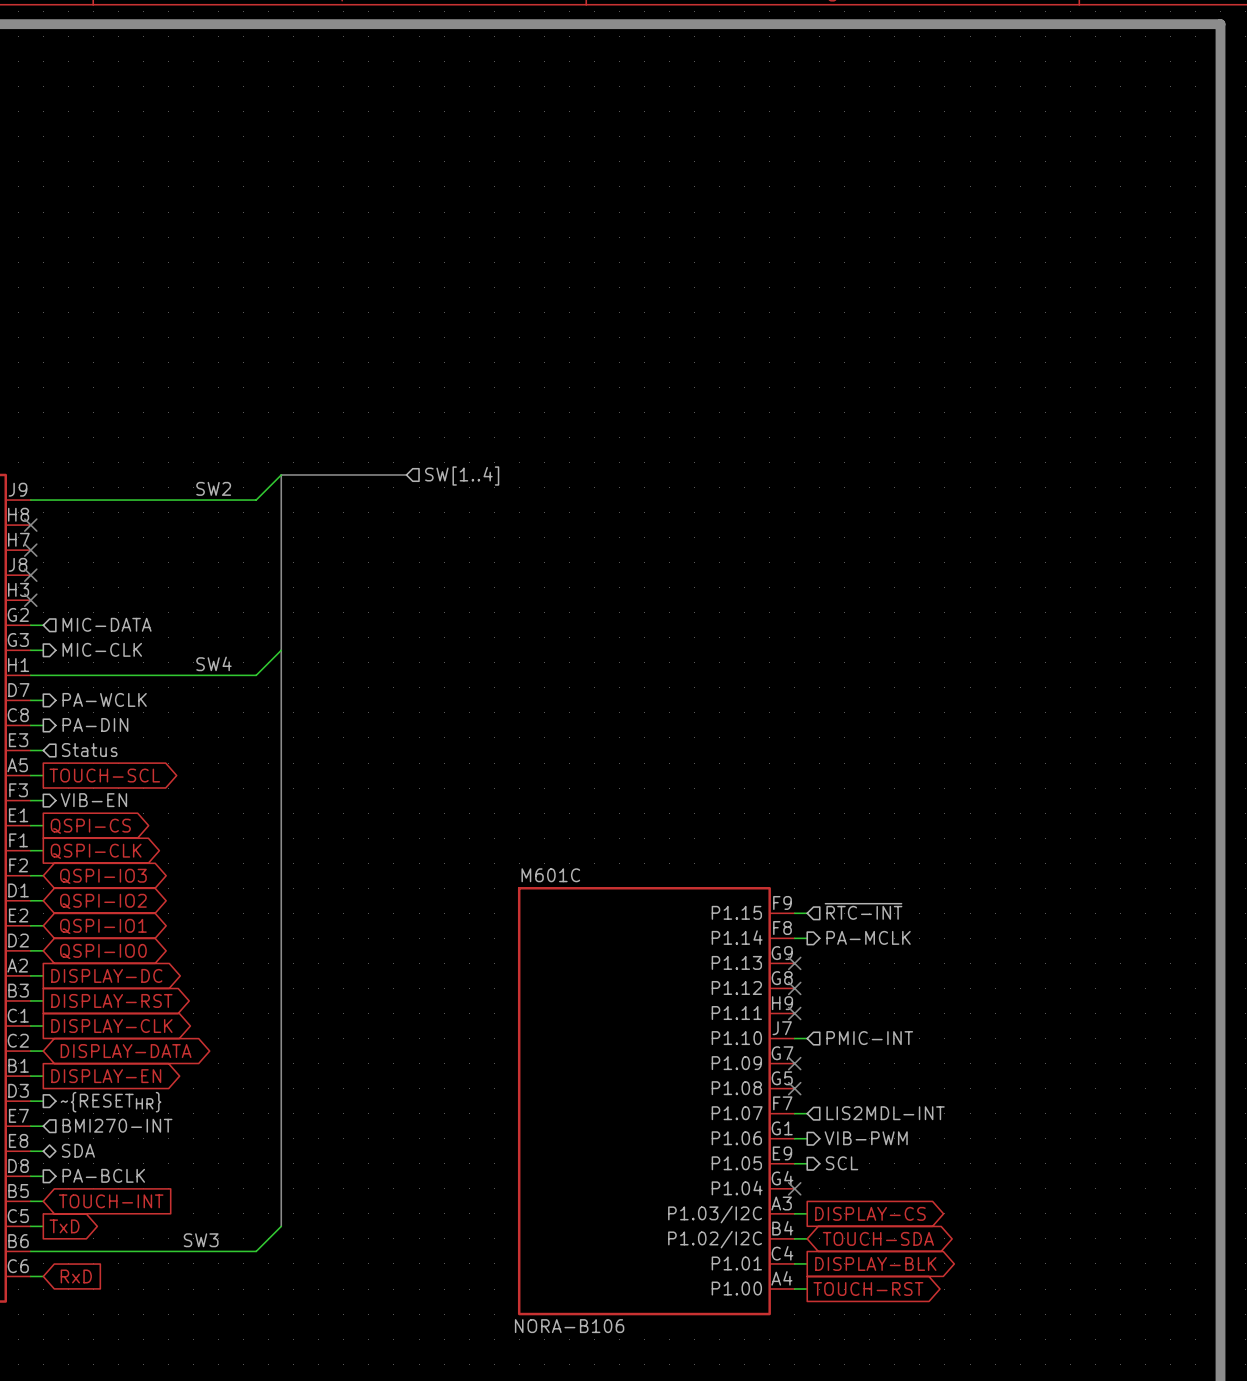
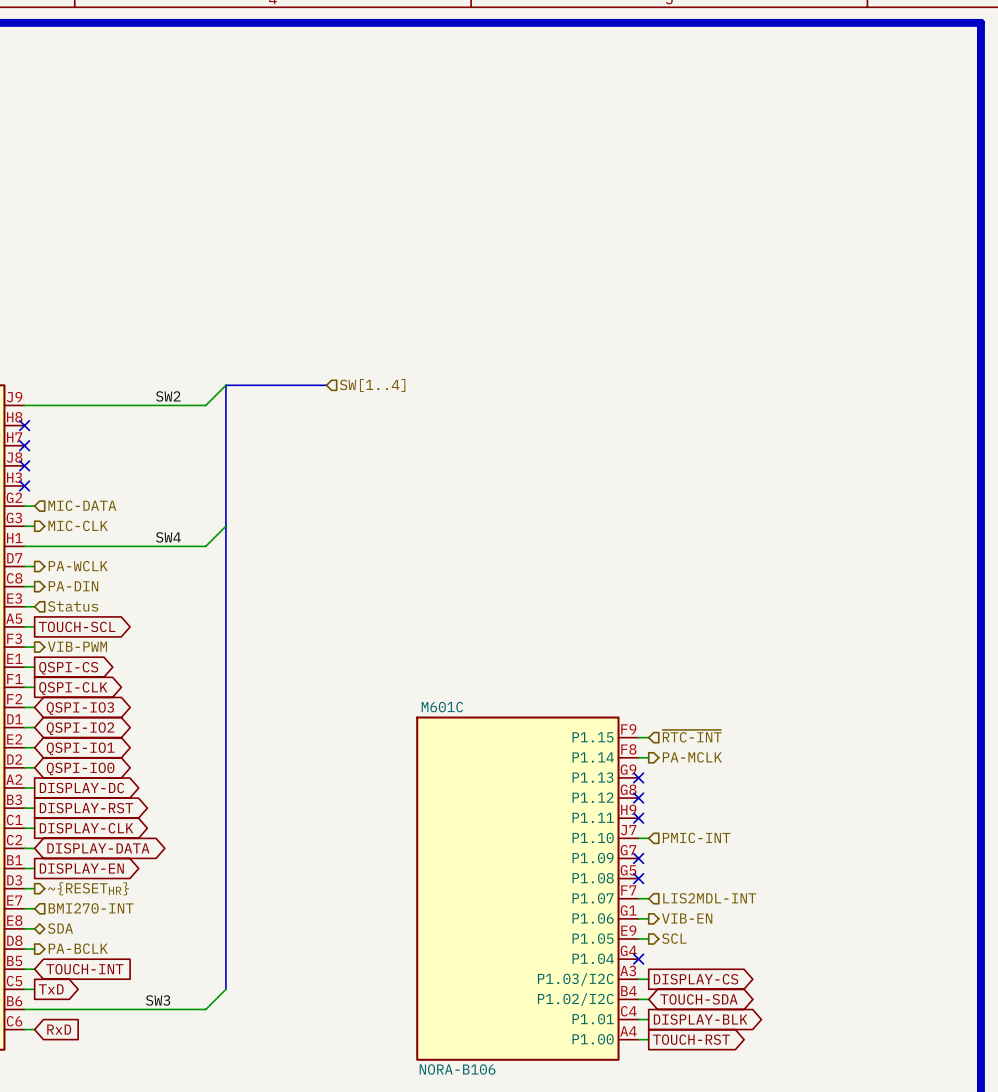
hierarchical label: VIB-EN (93, 800) -> VIB-PWM (77, 646)
hierarchical label: VIB-PWM (866, 1138) -> VIB-EN (687, 918)

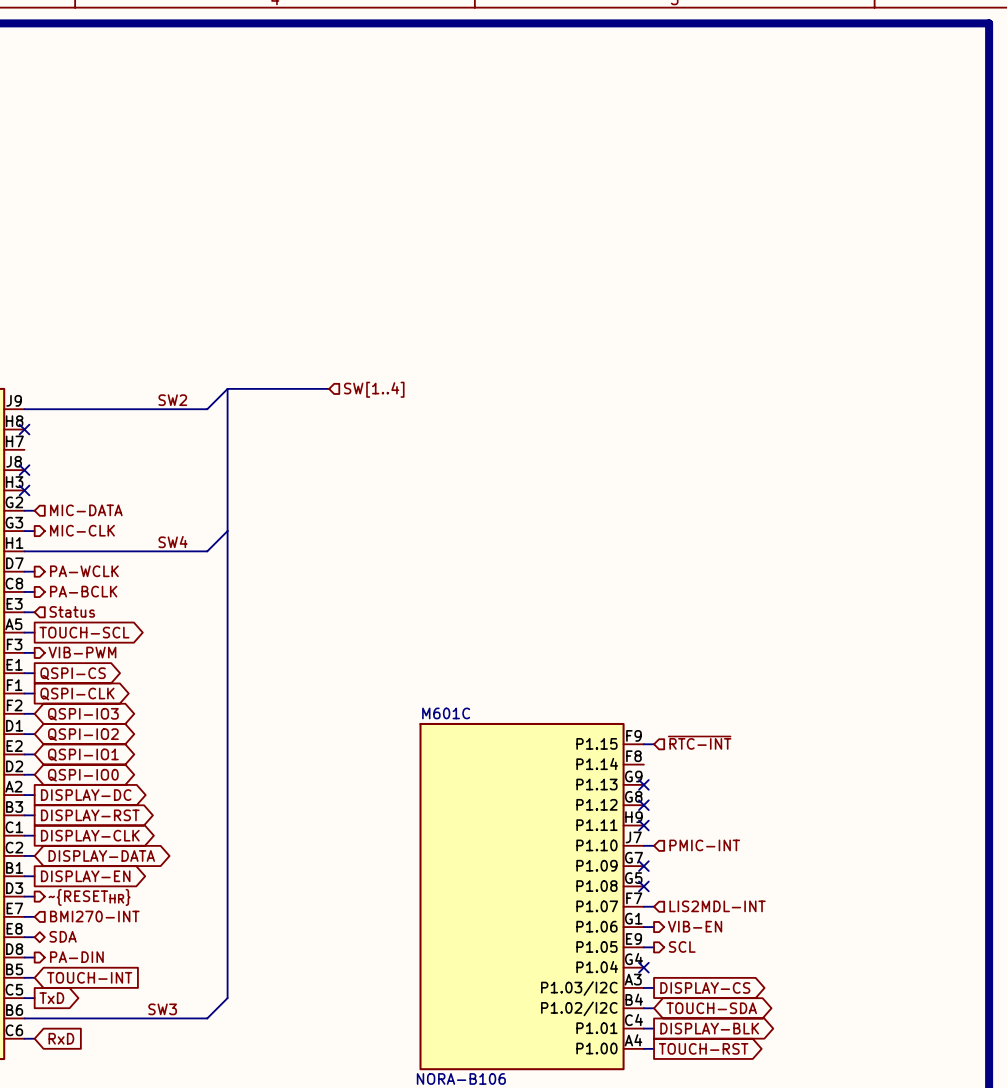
no-connect mark: (24, 445) -> none
hierarchical label: PA-DIN (73, 586) -> PA-BCLK (83, 591)
wire: (638, 757) (648, 757) -> none
hierarchical label: PA-MCLK (692, 757) -> none
hierarchical label: PA-BCLK (78, 948) -> PA-DIN (76, 957)

